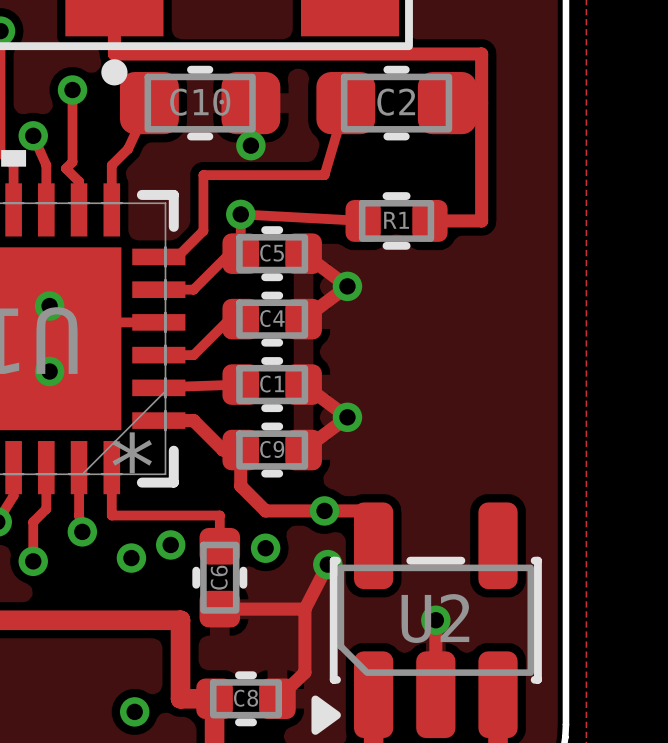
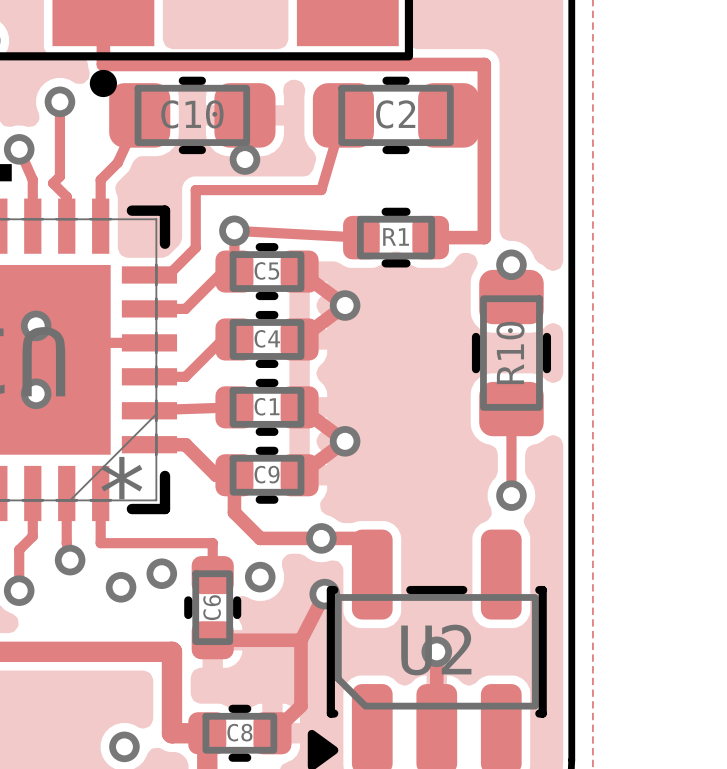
via: none -> (511, 264)
R10: none -> (511, 353)
track: none -> (511, 409) (511, 495)
via: none -> (511, 495)

